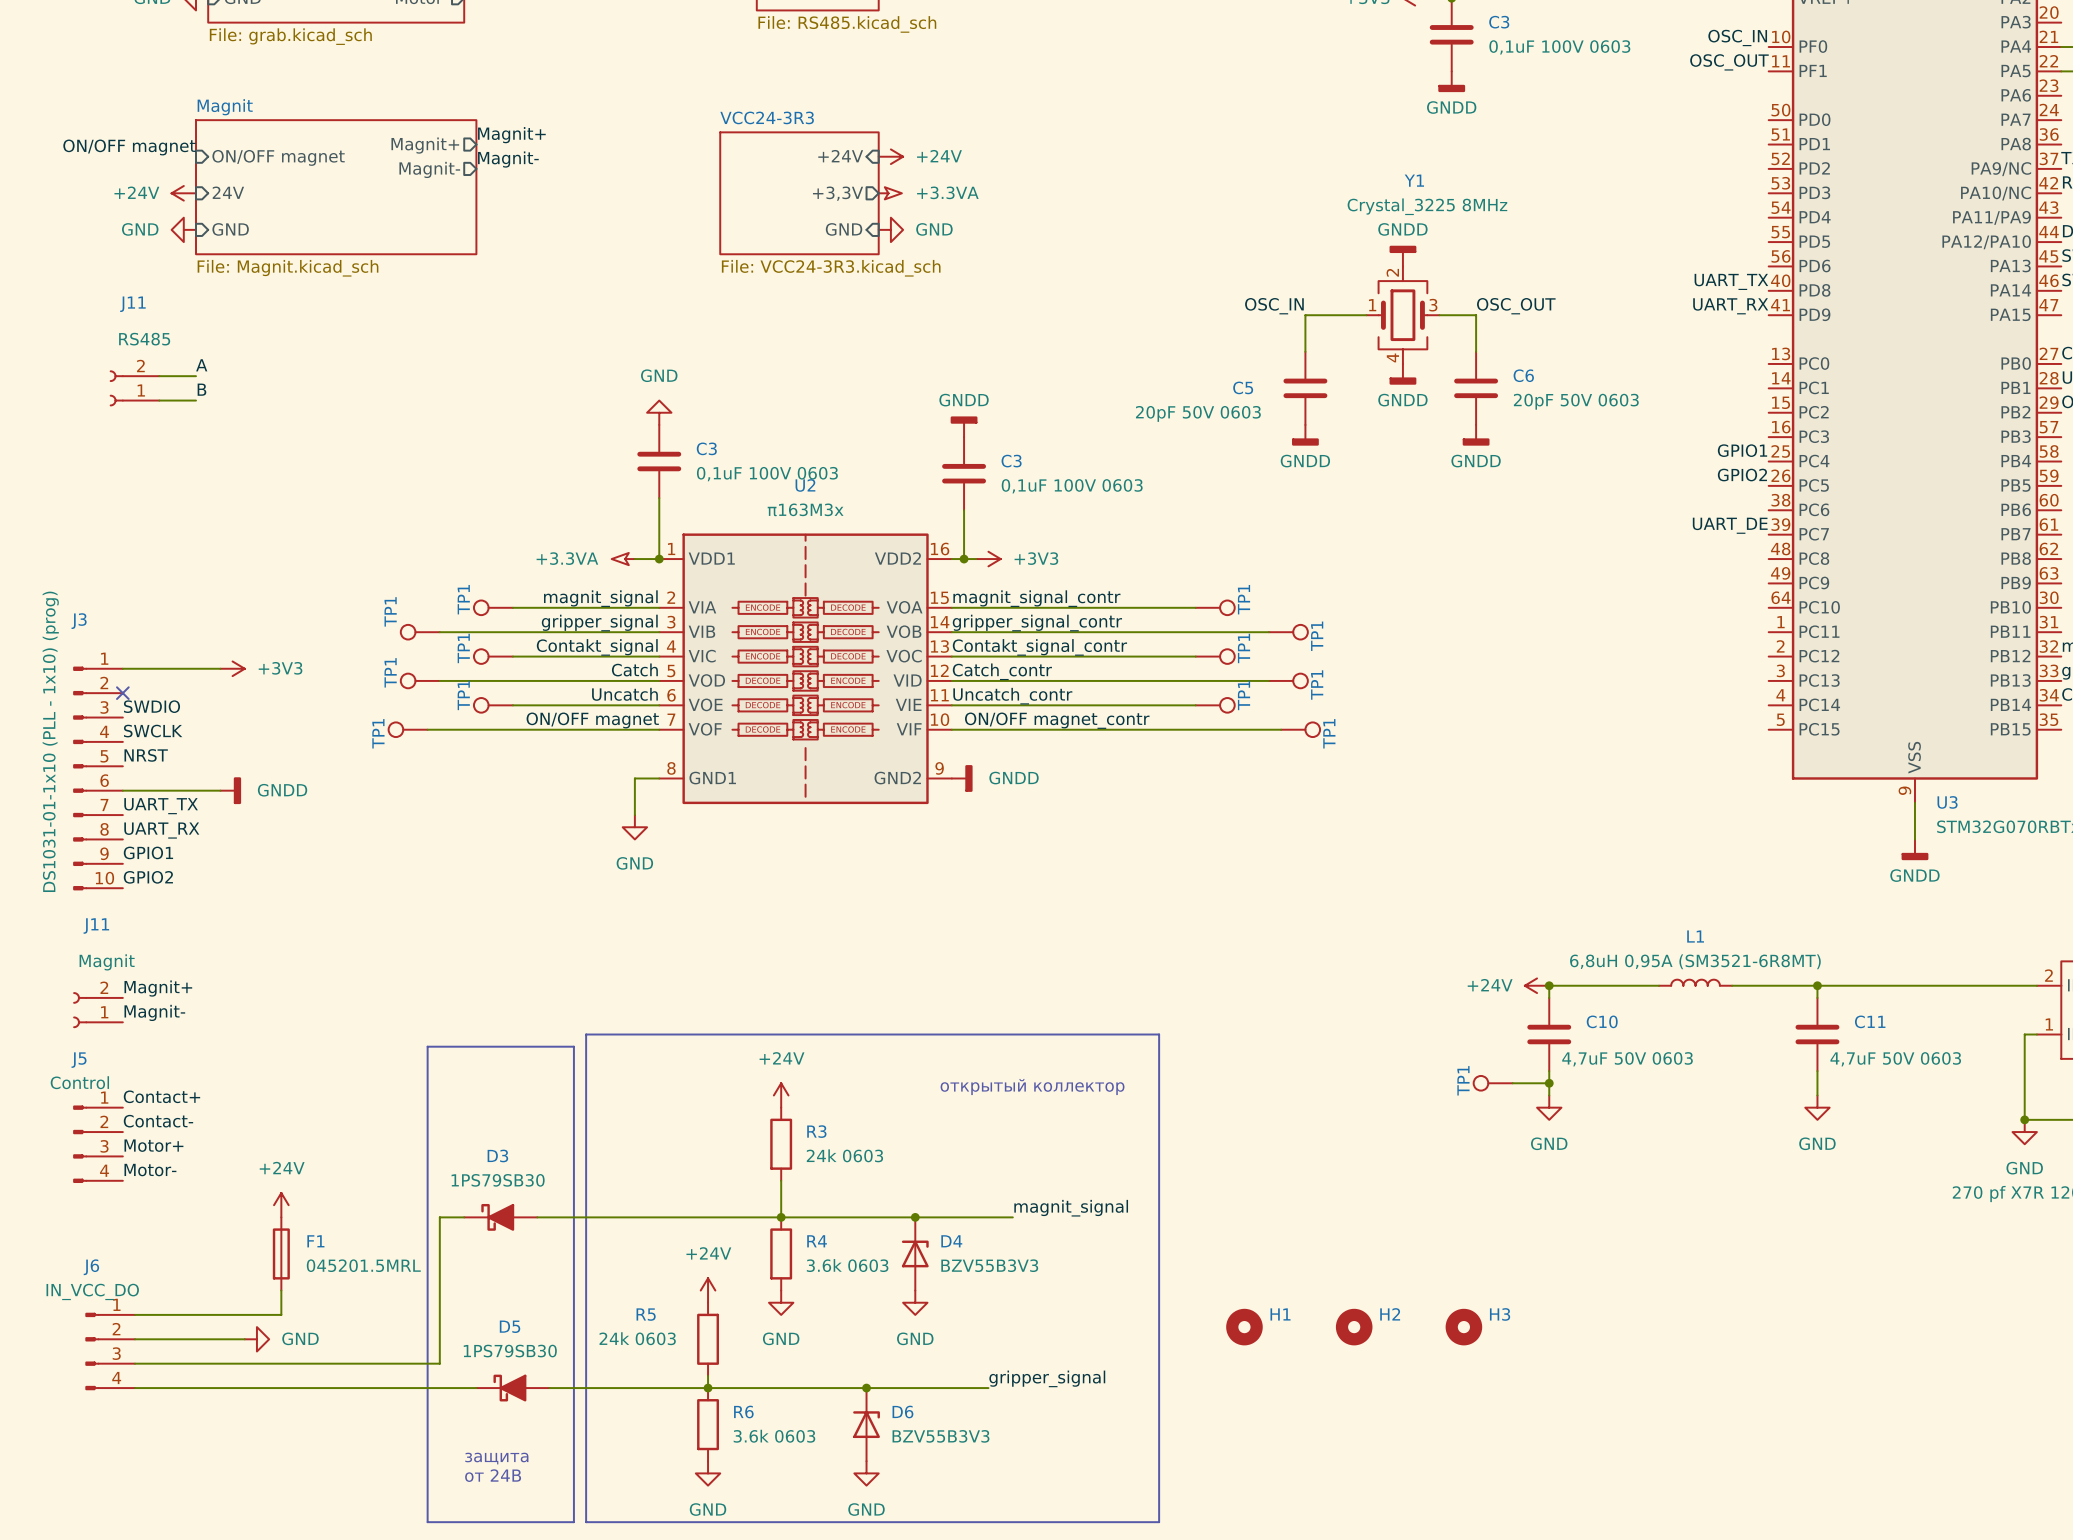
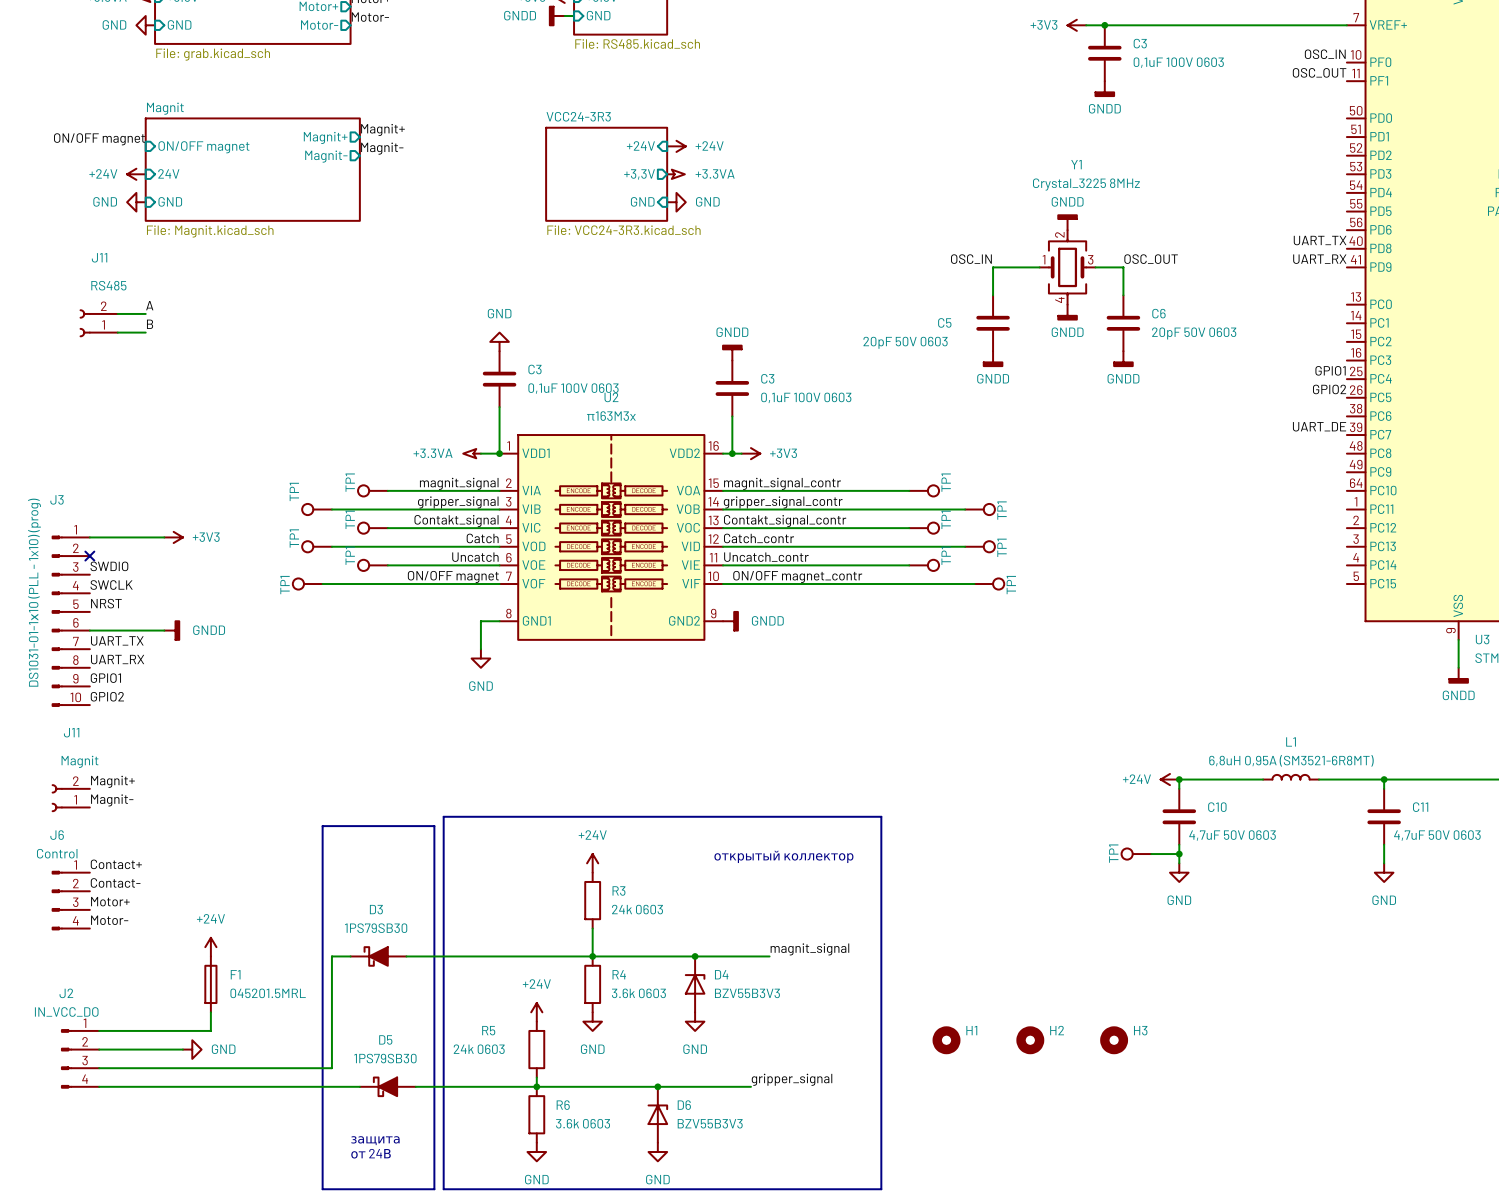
J5 name: J5 (79, 1060) -> J6 (57, 835)
J6 name: J6 (91, 1267) -> J2 (66, 993)

